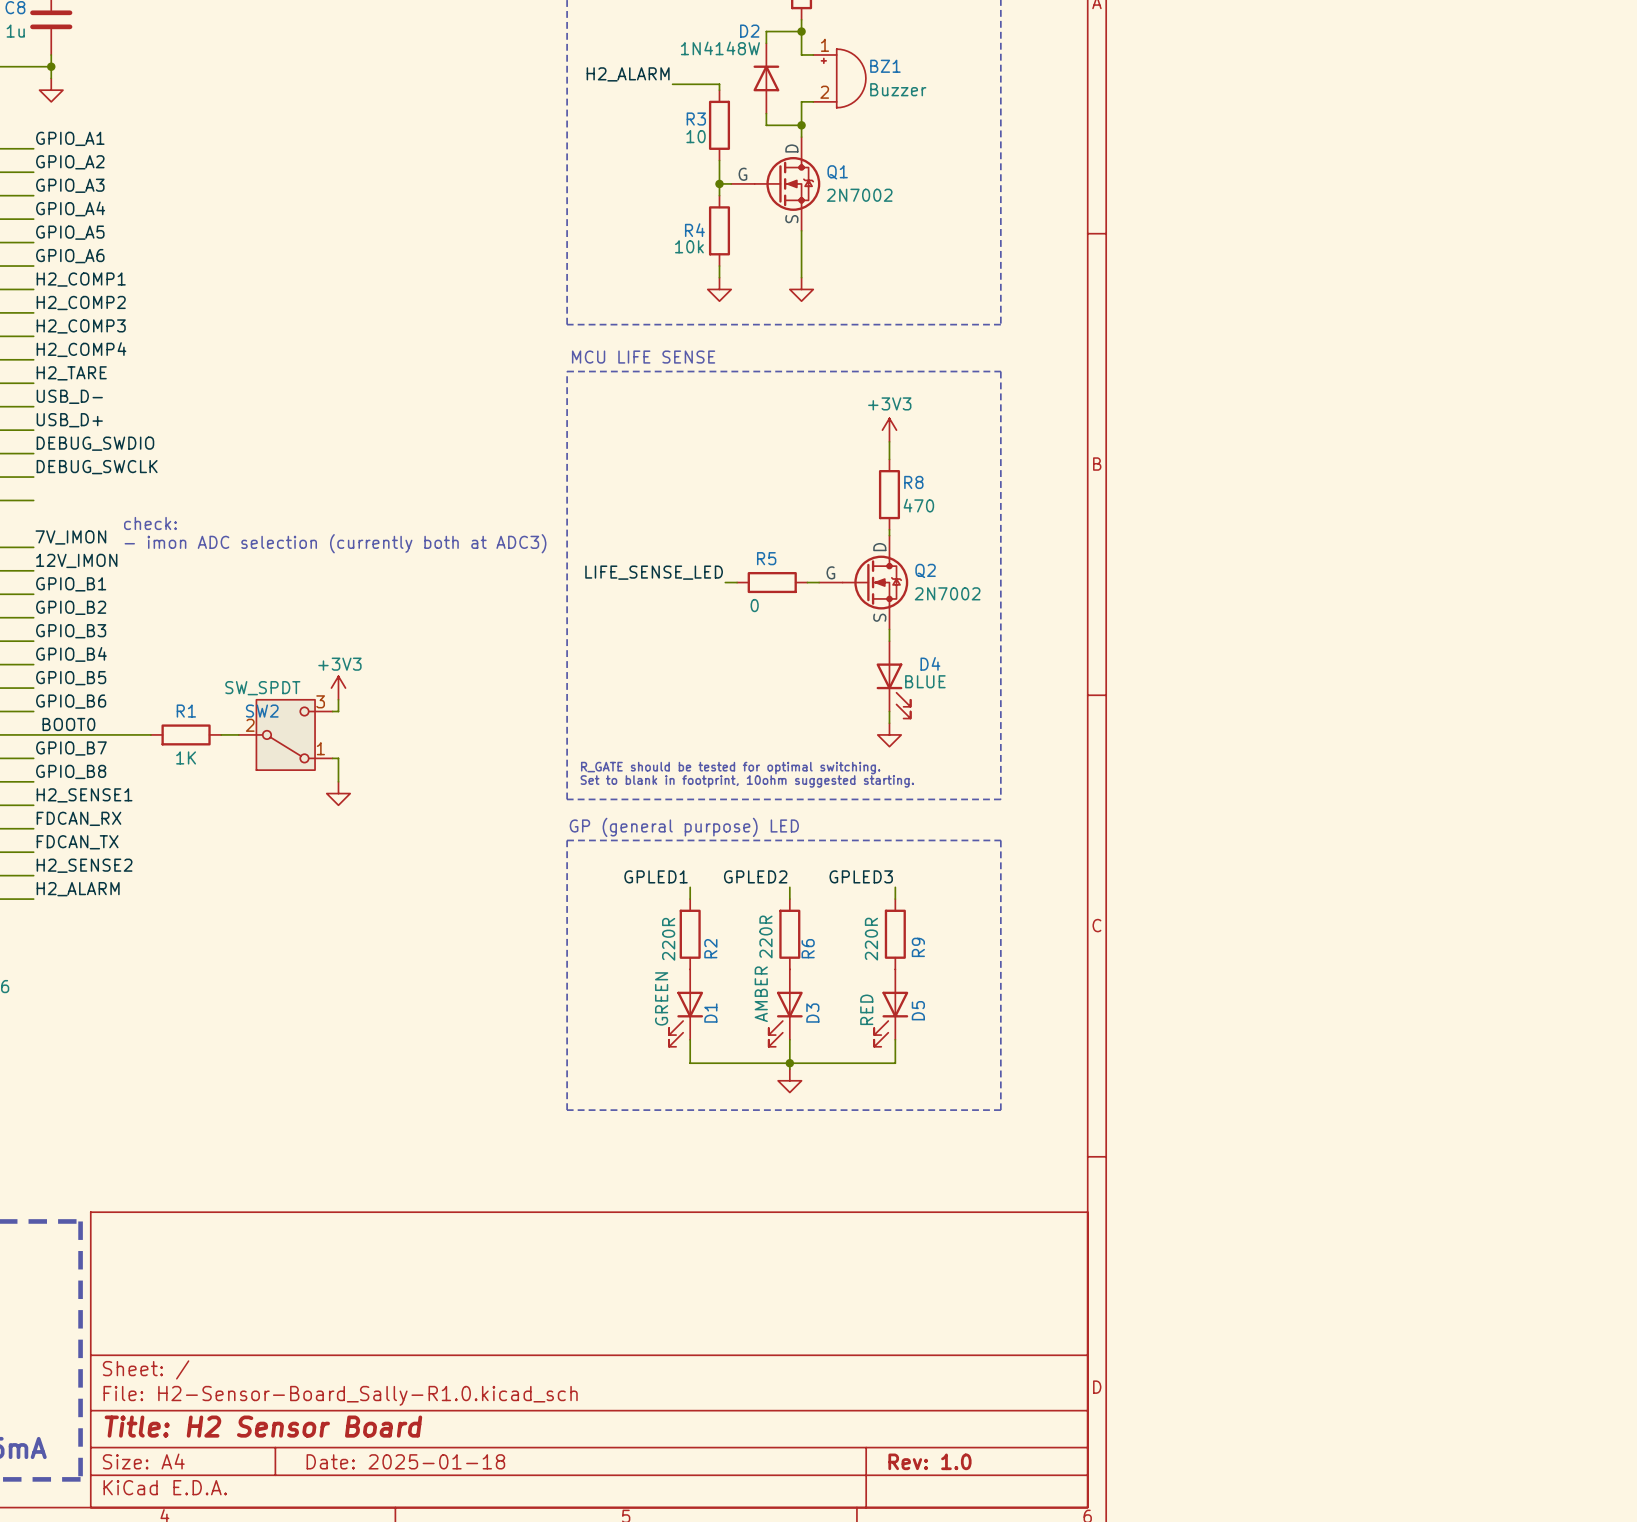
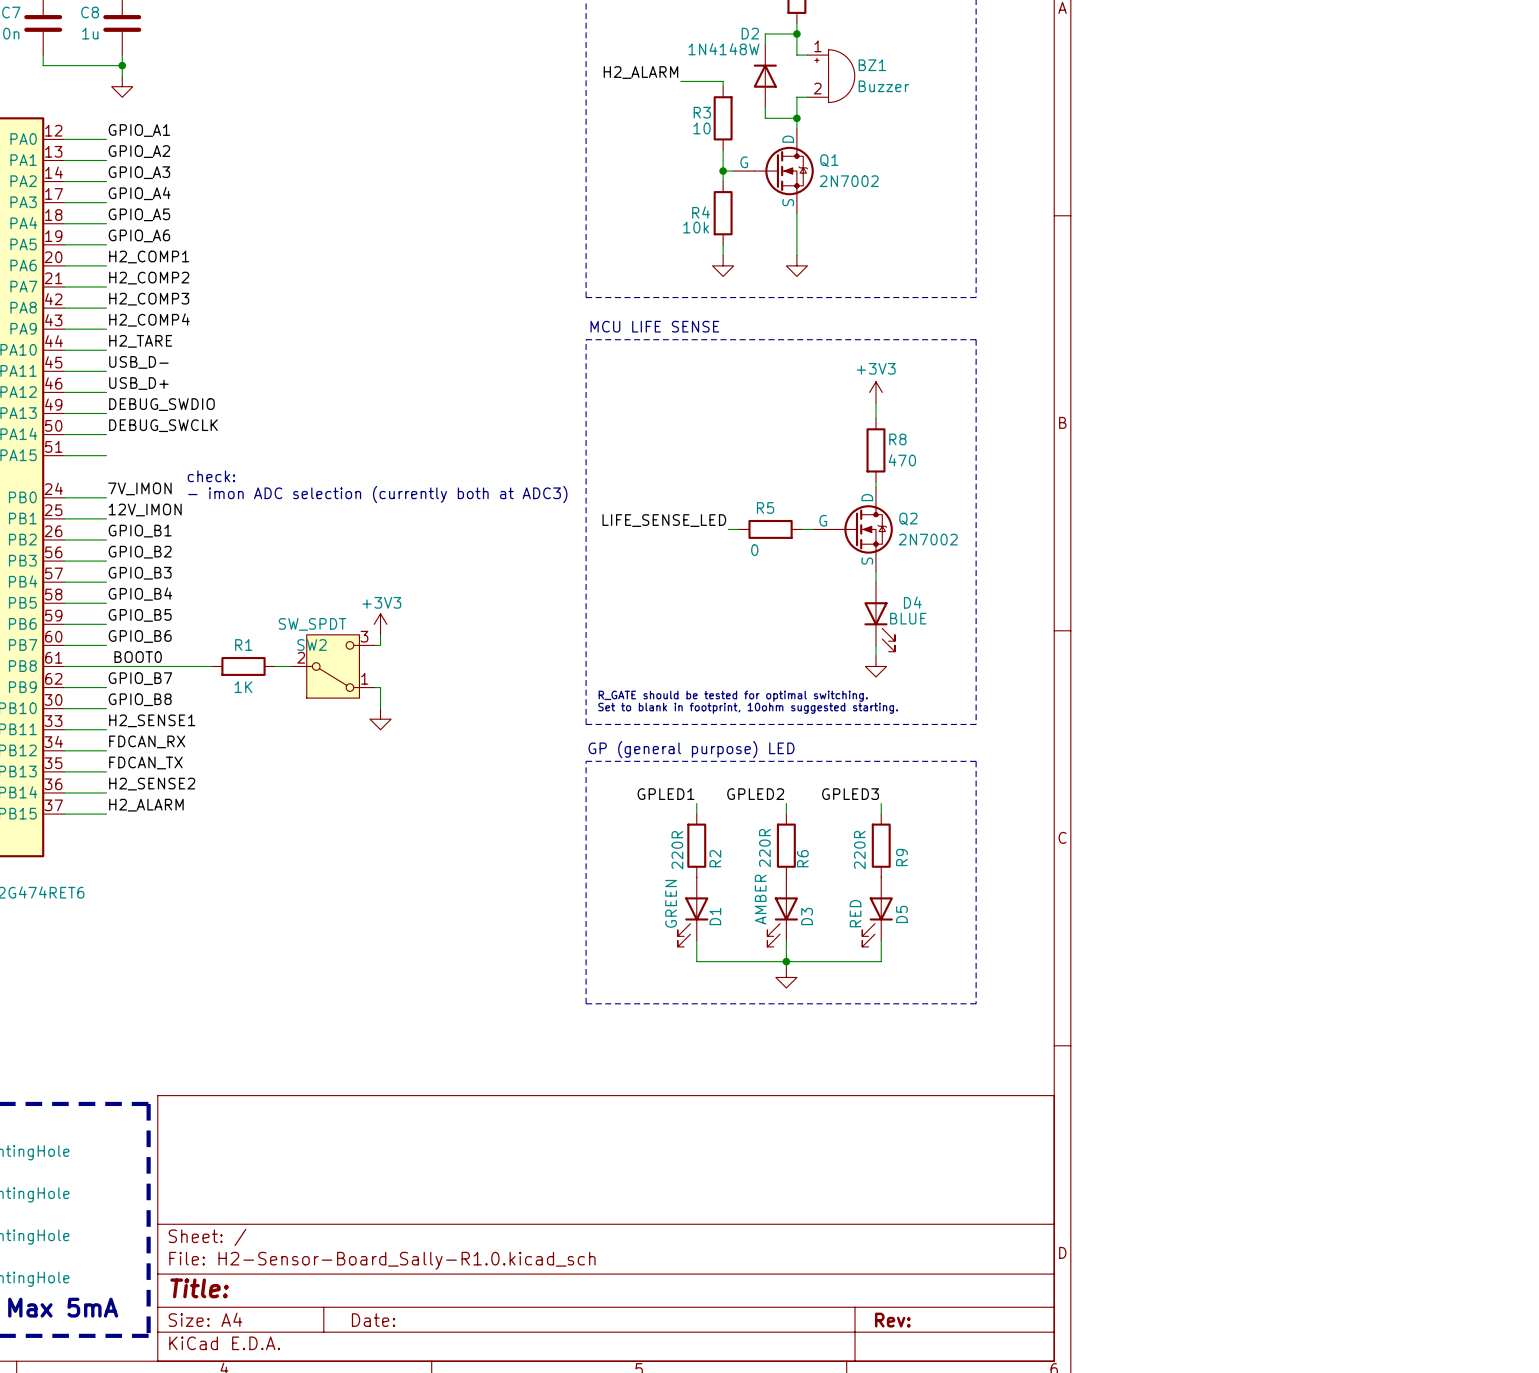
title block: Title: H2 Sensor Board (263, 1426) -> Title: (199, 1288)
title block: Date: 2025-01-18 (405, 1461) -> Date: (373, 1320)
title block: Rev: 1.0 (929, 1461) -> Rev: (892, 1320)

